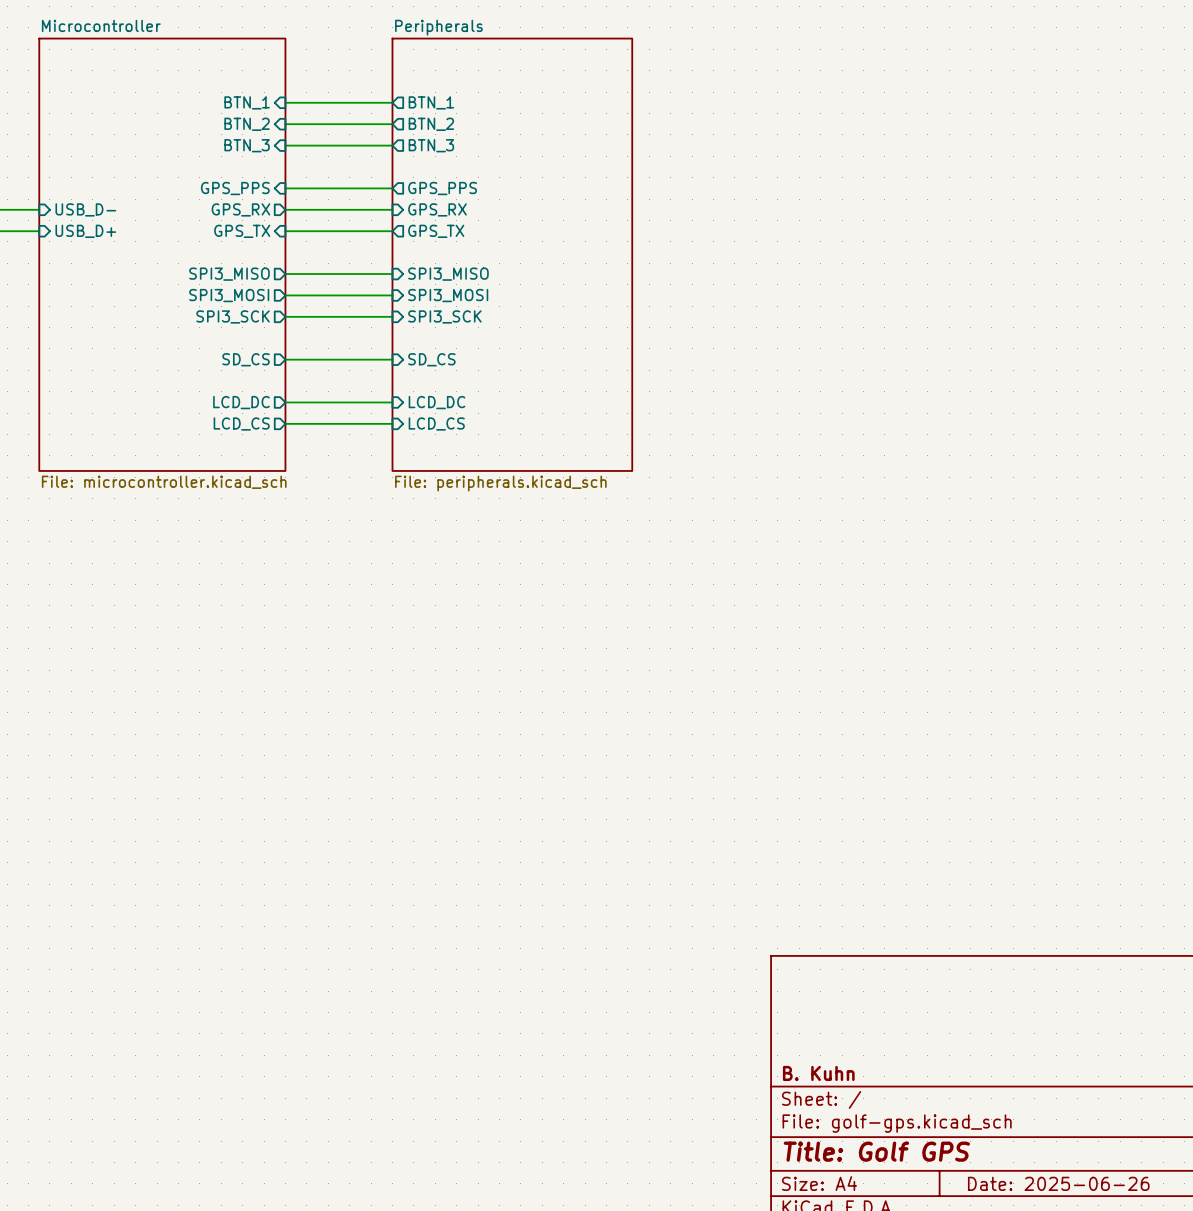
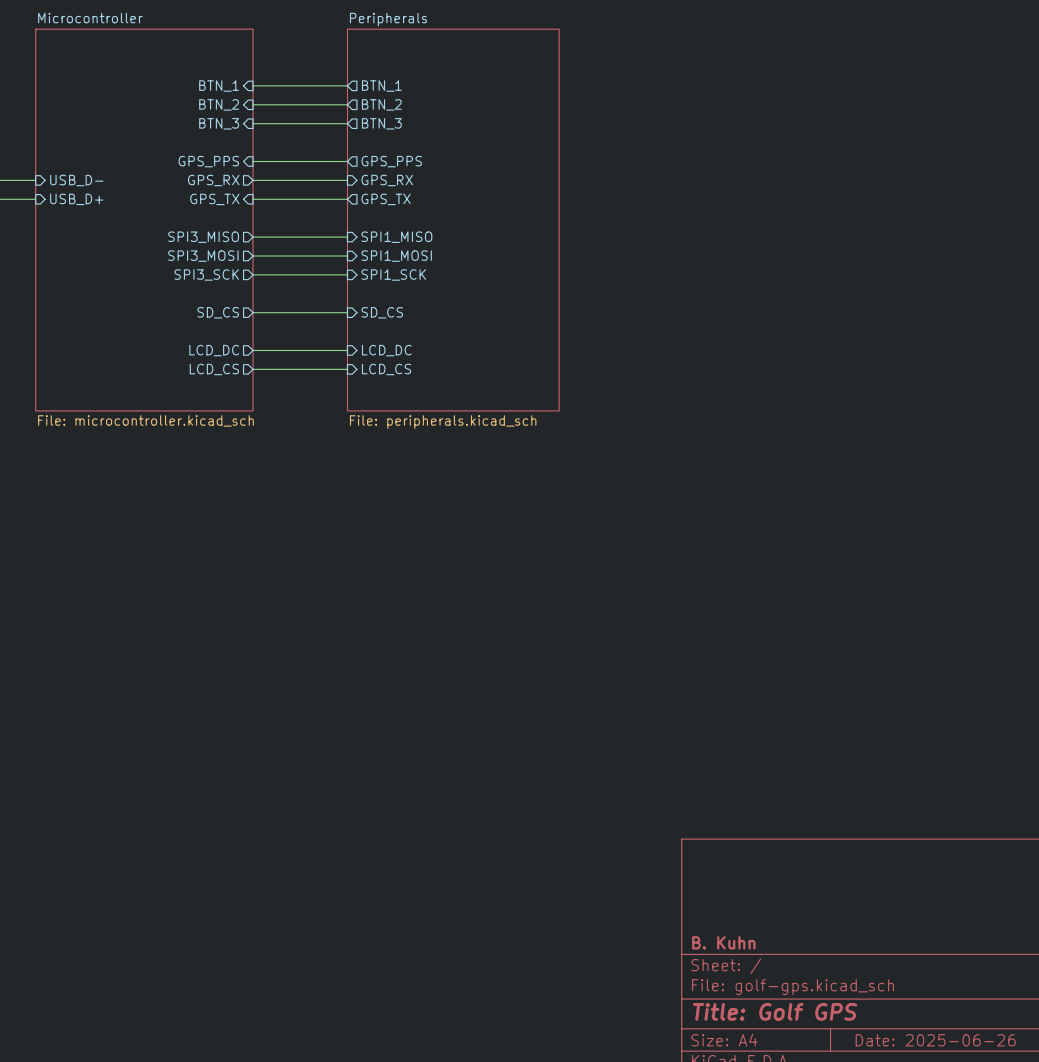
sheet pin: SPI3_MISO (448, 274) -> SPI1_MISO (396, 237)
sheet pin: SPI3_MOSI (448, 295) -> SPI1_MOSI (396, 256)
sheet pin: SPI3_SCK (444, 316) -> SPI1_SCK (393, 274)

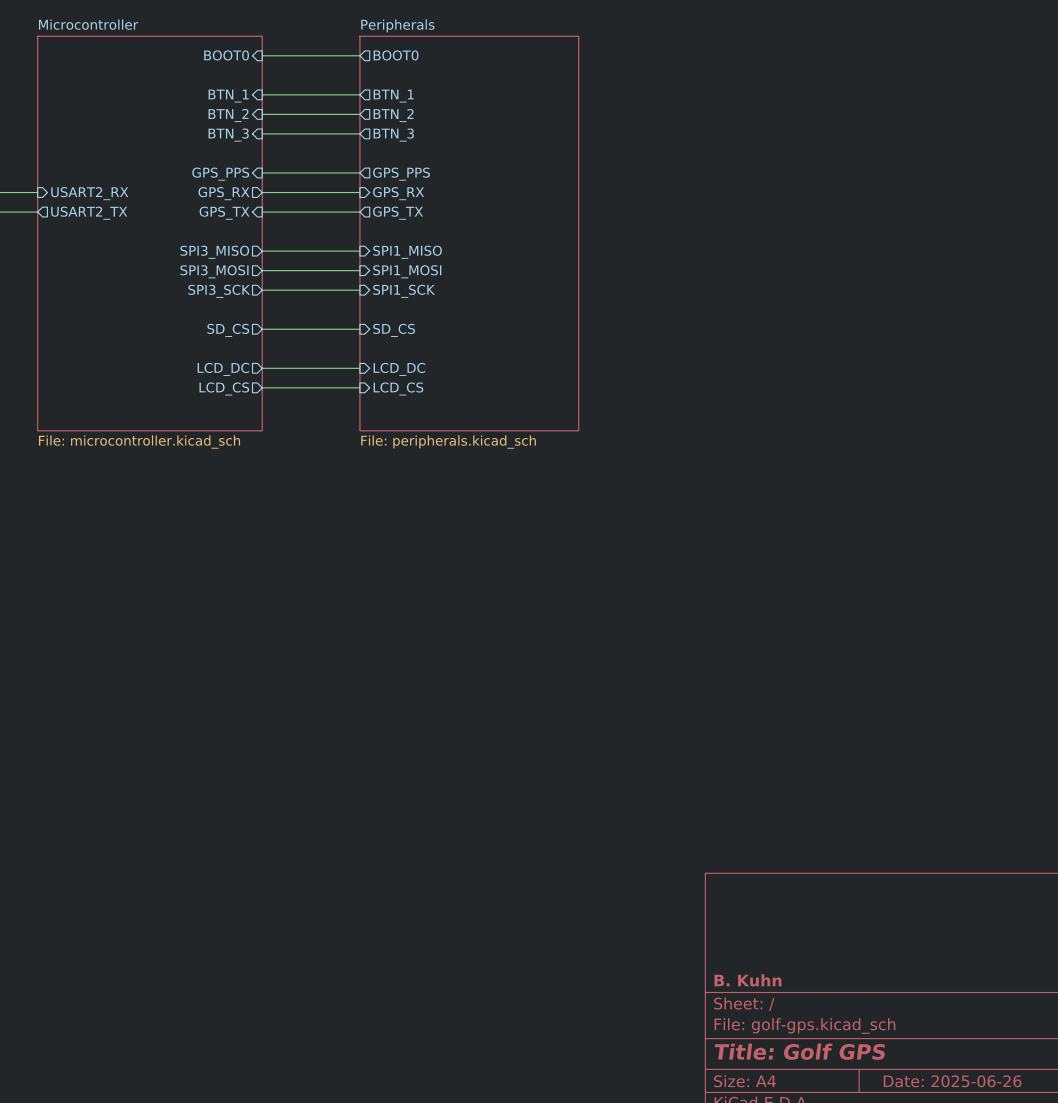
sheet pin: none -> BOOT0 (226, 55)
sheet pin: none -> BOOT0 (396, 55)
wire: none -> (262, 55) (359, 55)
sheet pin: USB_D- (76, 180) -> USART2_RX (89, 193)
sheet pin shape: input (76, 199) -> output (89, 213)
sheet pin: USB_D+ (76, 199) -> USART2_TX (89, 213)

